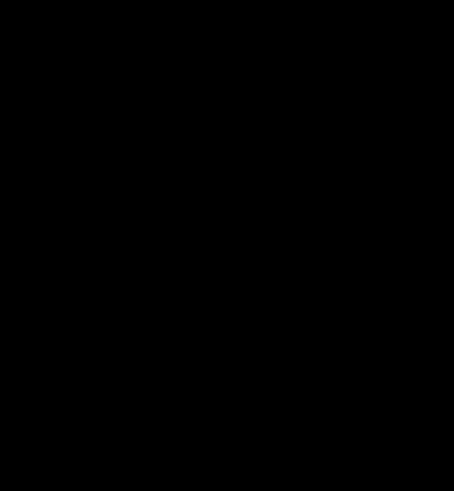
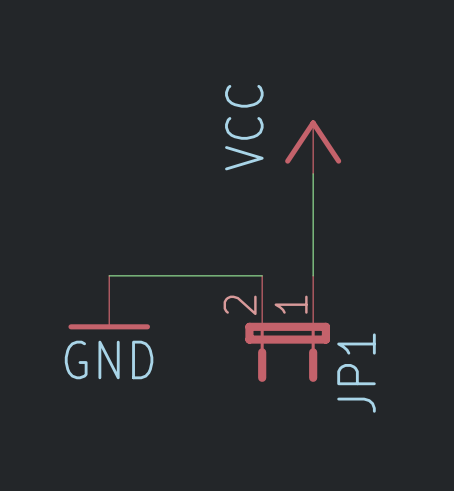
power symbol: none -> VCC (313, 147)
wire: none -> (313, 173) (313, 275)
wire: none -> (109, 275) (262, 275)
power symbol: none -> GND (109, 302)
JP1: none -> (287, 328)

